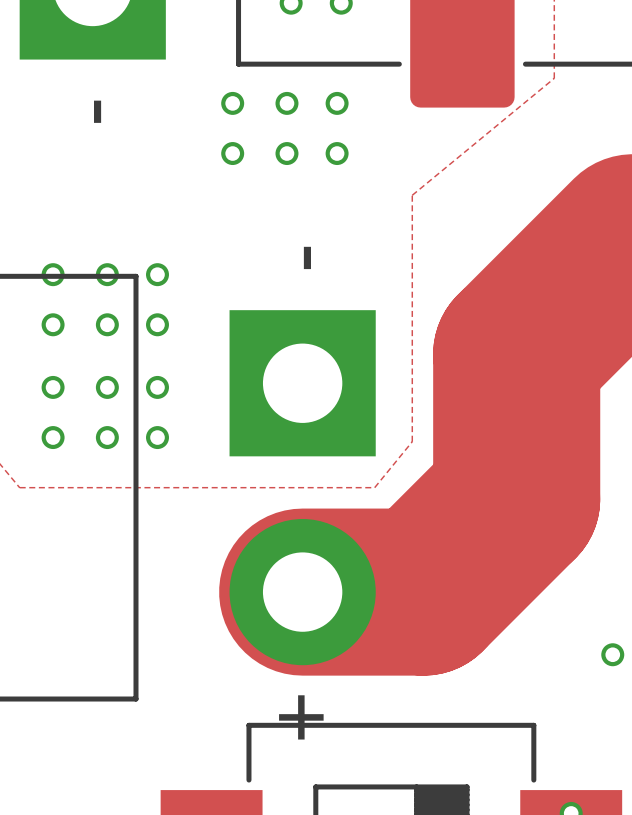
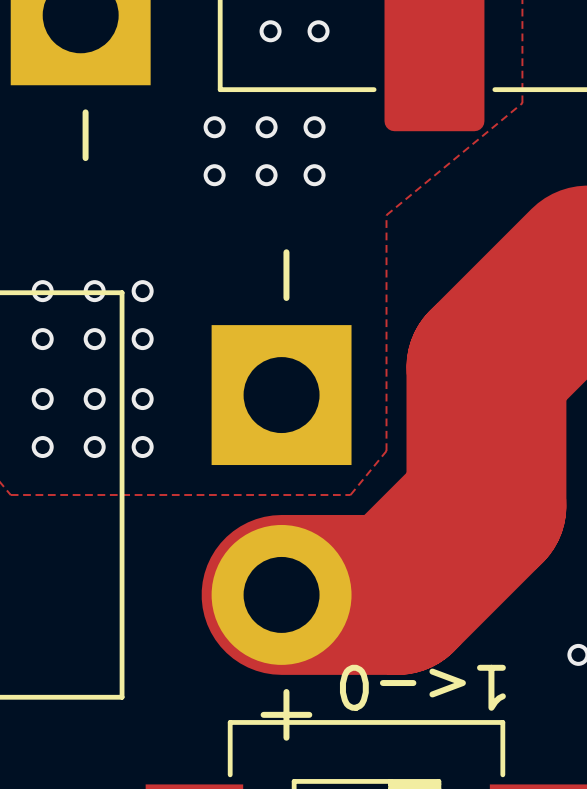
text: none -> 1<-0 (422, 687)

